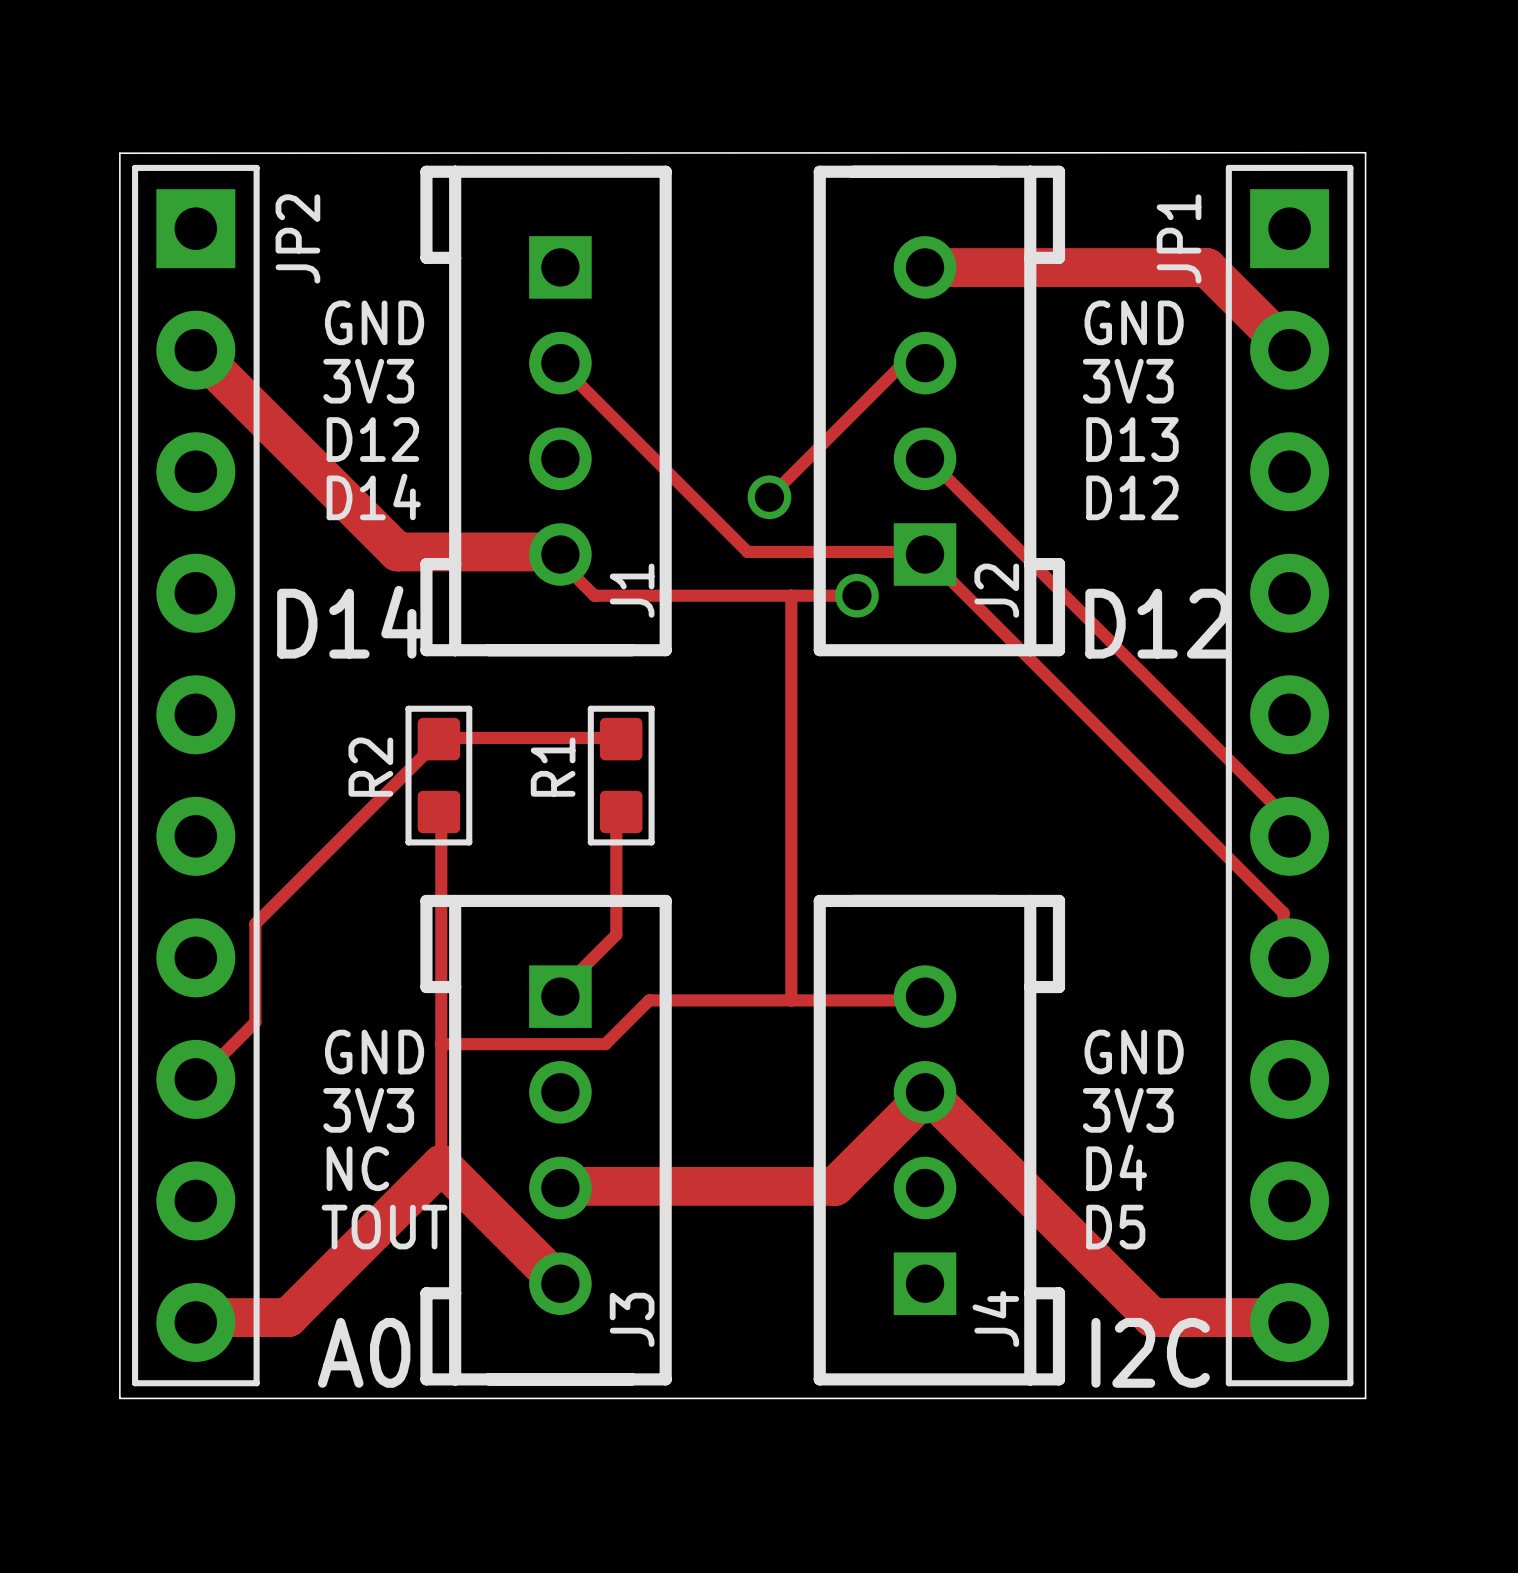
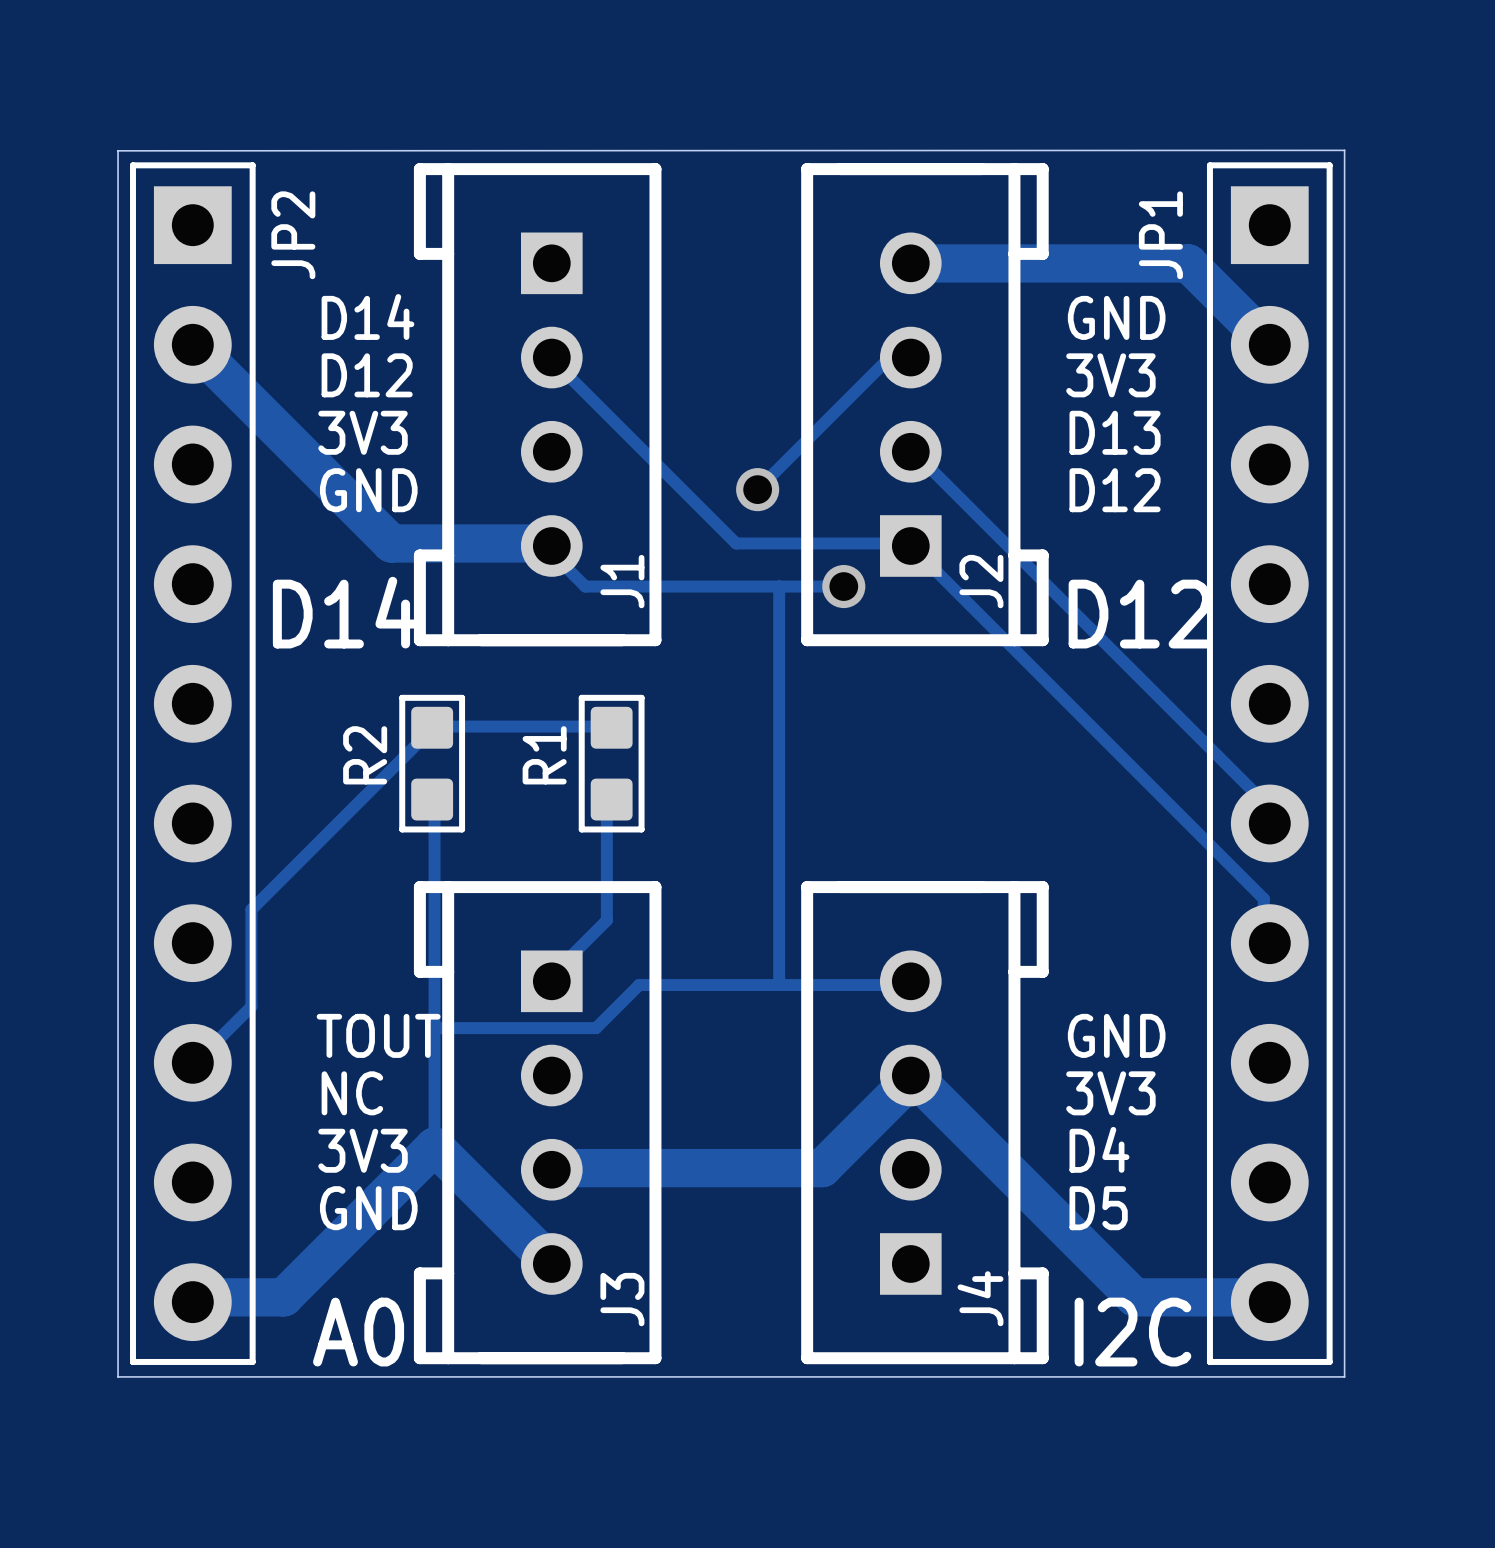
text: GND (374, 322) -> D14 (367, 316)
text: 3V3 (368, 381) -> D12 (367, 375)
text: D12 (372, 439) -> 3V3 (363, 432)
text: D14 (373, 496) -> GND (368, 490)
text: GND (374, 1052) -> TOUT (378, 1035)
text: 3V3 (368, 1110) -> NC (352, 1093)
text: NC (357, 1168) -> 3V3 (363, 1150)
text: TOUT (384, 1227) -> GND (368, 1208)

